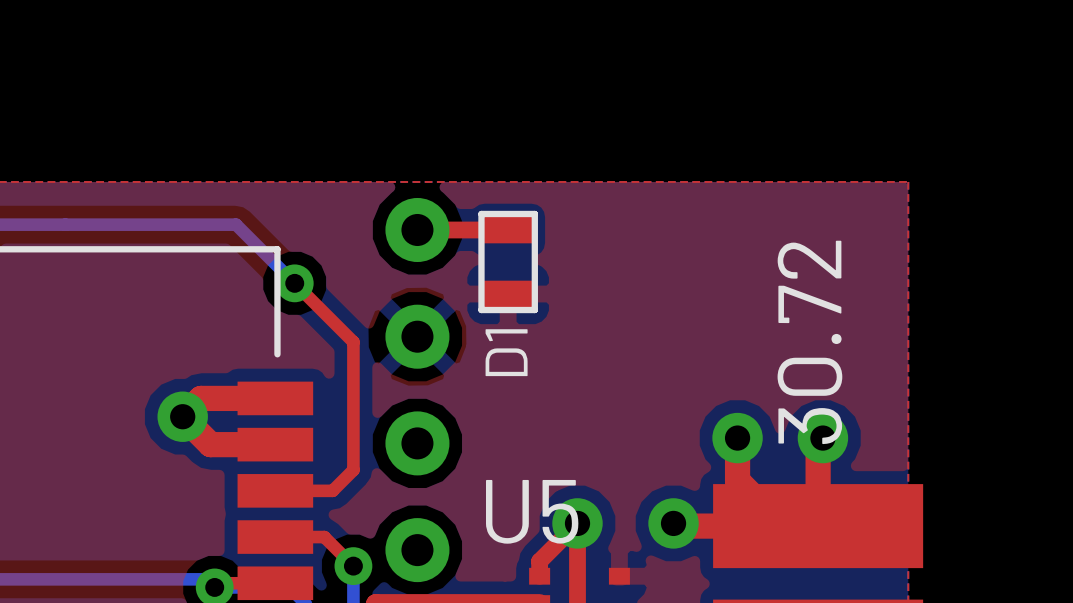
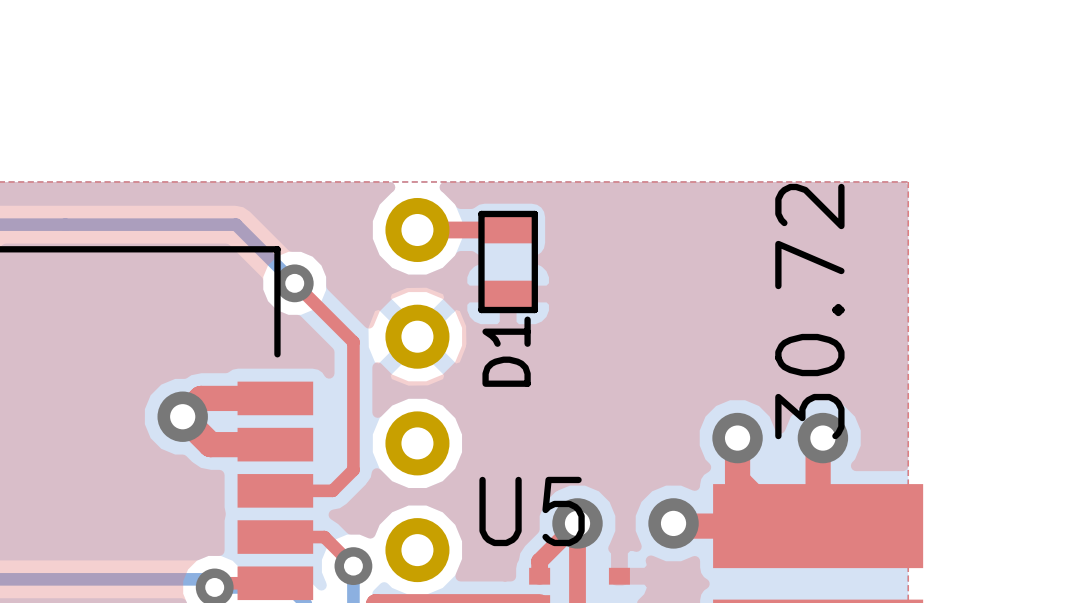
part value position: 30.72 (809, 342) -> 30.72 (809, 311)

